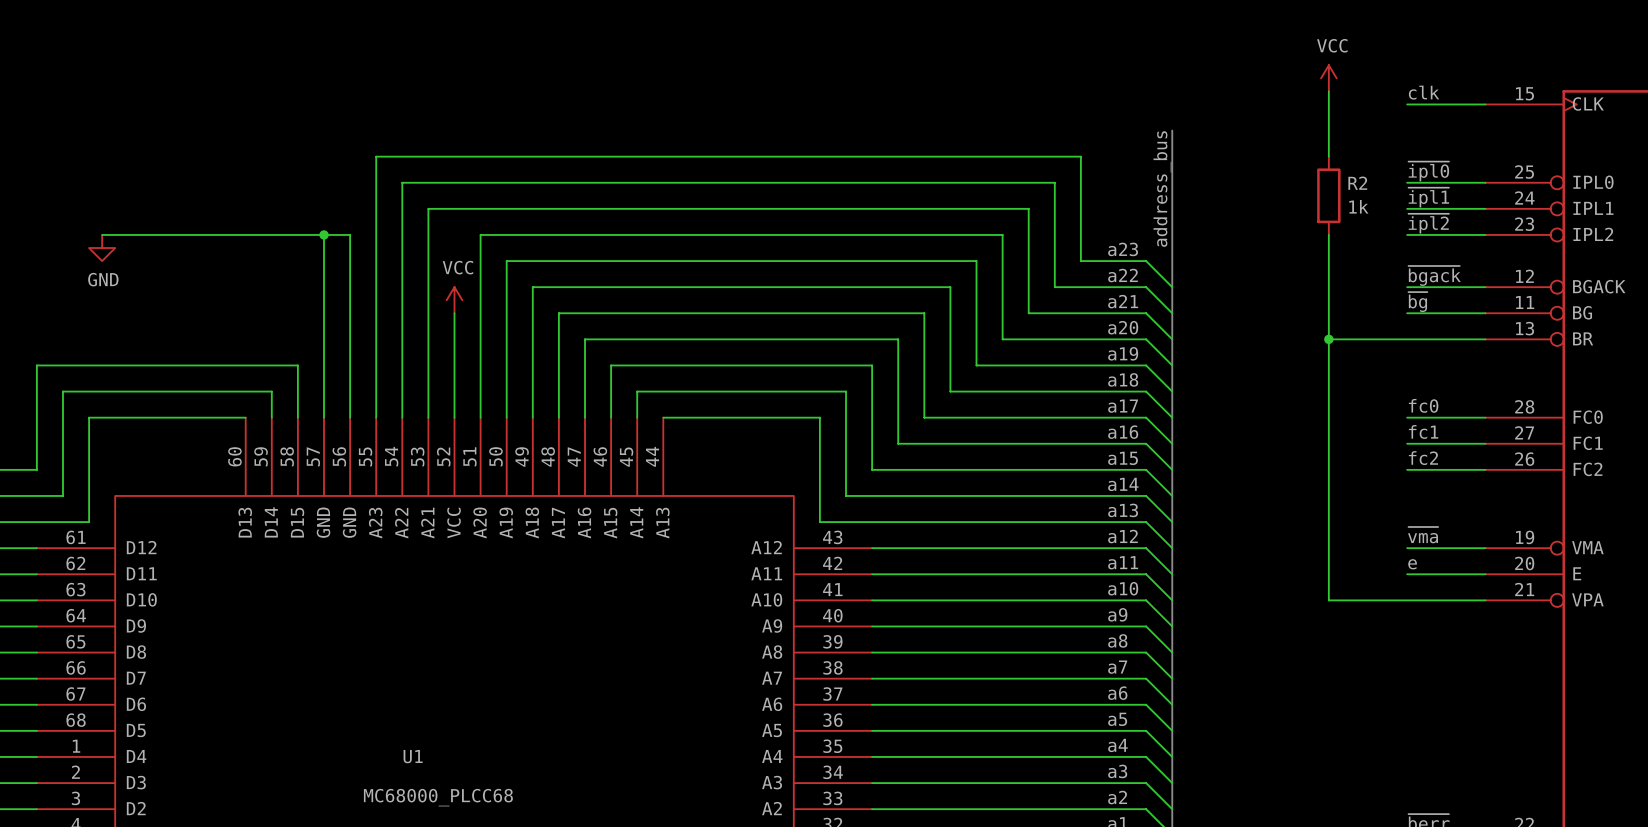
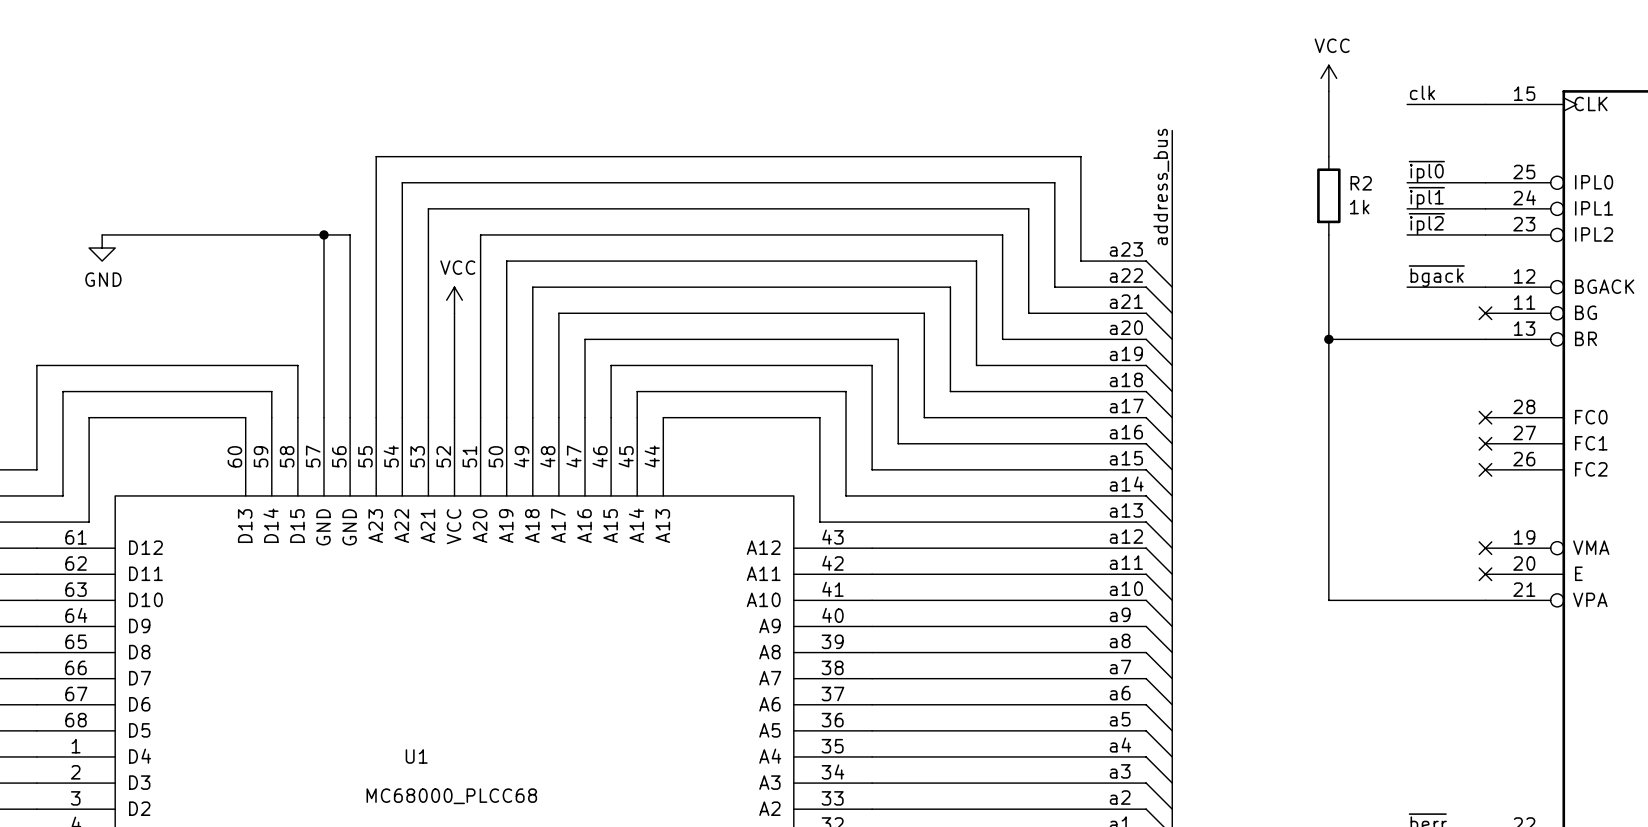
label: ~{bg} (1417, 302) -> none
wire: (1407, 313) (1485, 313) -> none
no-connect mark: none -> (1485, 313)
label: fc0 (1423, 405) -> none
wire: (1407, 417) (1485, 417) -> none
no-connect mark: none -> (1485, 417)
label: fc1 (1423, 431) -> none
wire: (1407, 443) (1485, 443) -> none
no-connect mark: none -> (1485, 443)
label: fc2 (1423, 458) -> none
wire: (1407, 469) (1485, 469) -> none
no-connect mark: none -> (1485, 469)
label: ~{vma} (1423, 535) -> none
wire: (1407, 548) (1485, 548) -> none
no-connect mark: none -> (1485, 548)
label: e (1412, 564) -> none
wire: (1407, 574) (1485, 574) -> none
no-connect mark: none -> (1485, 574)

